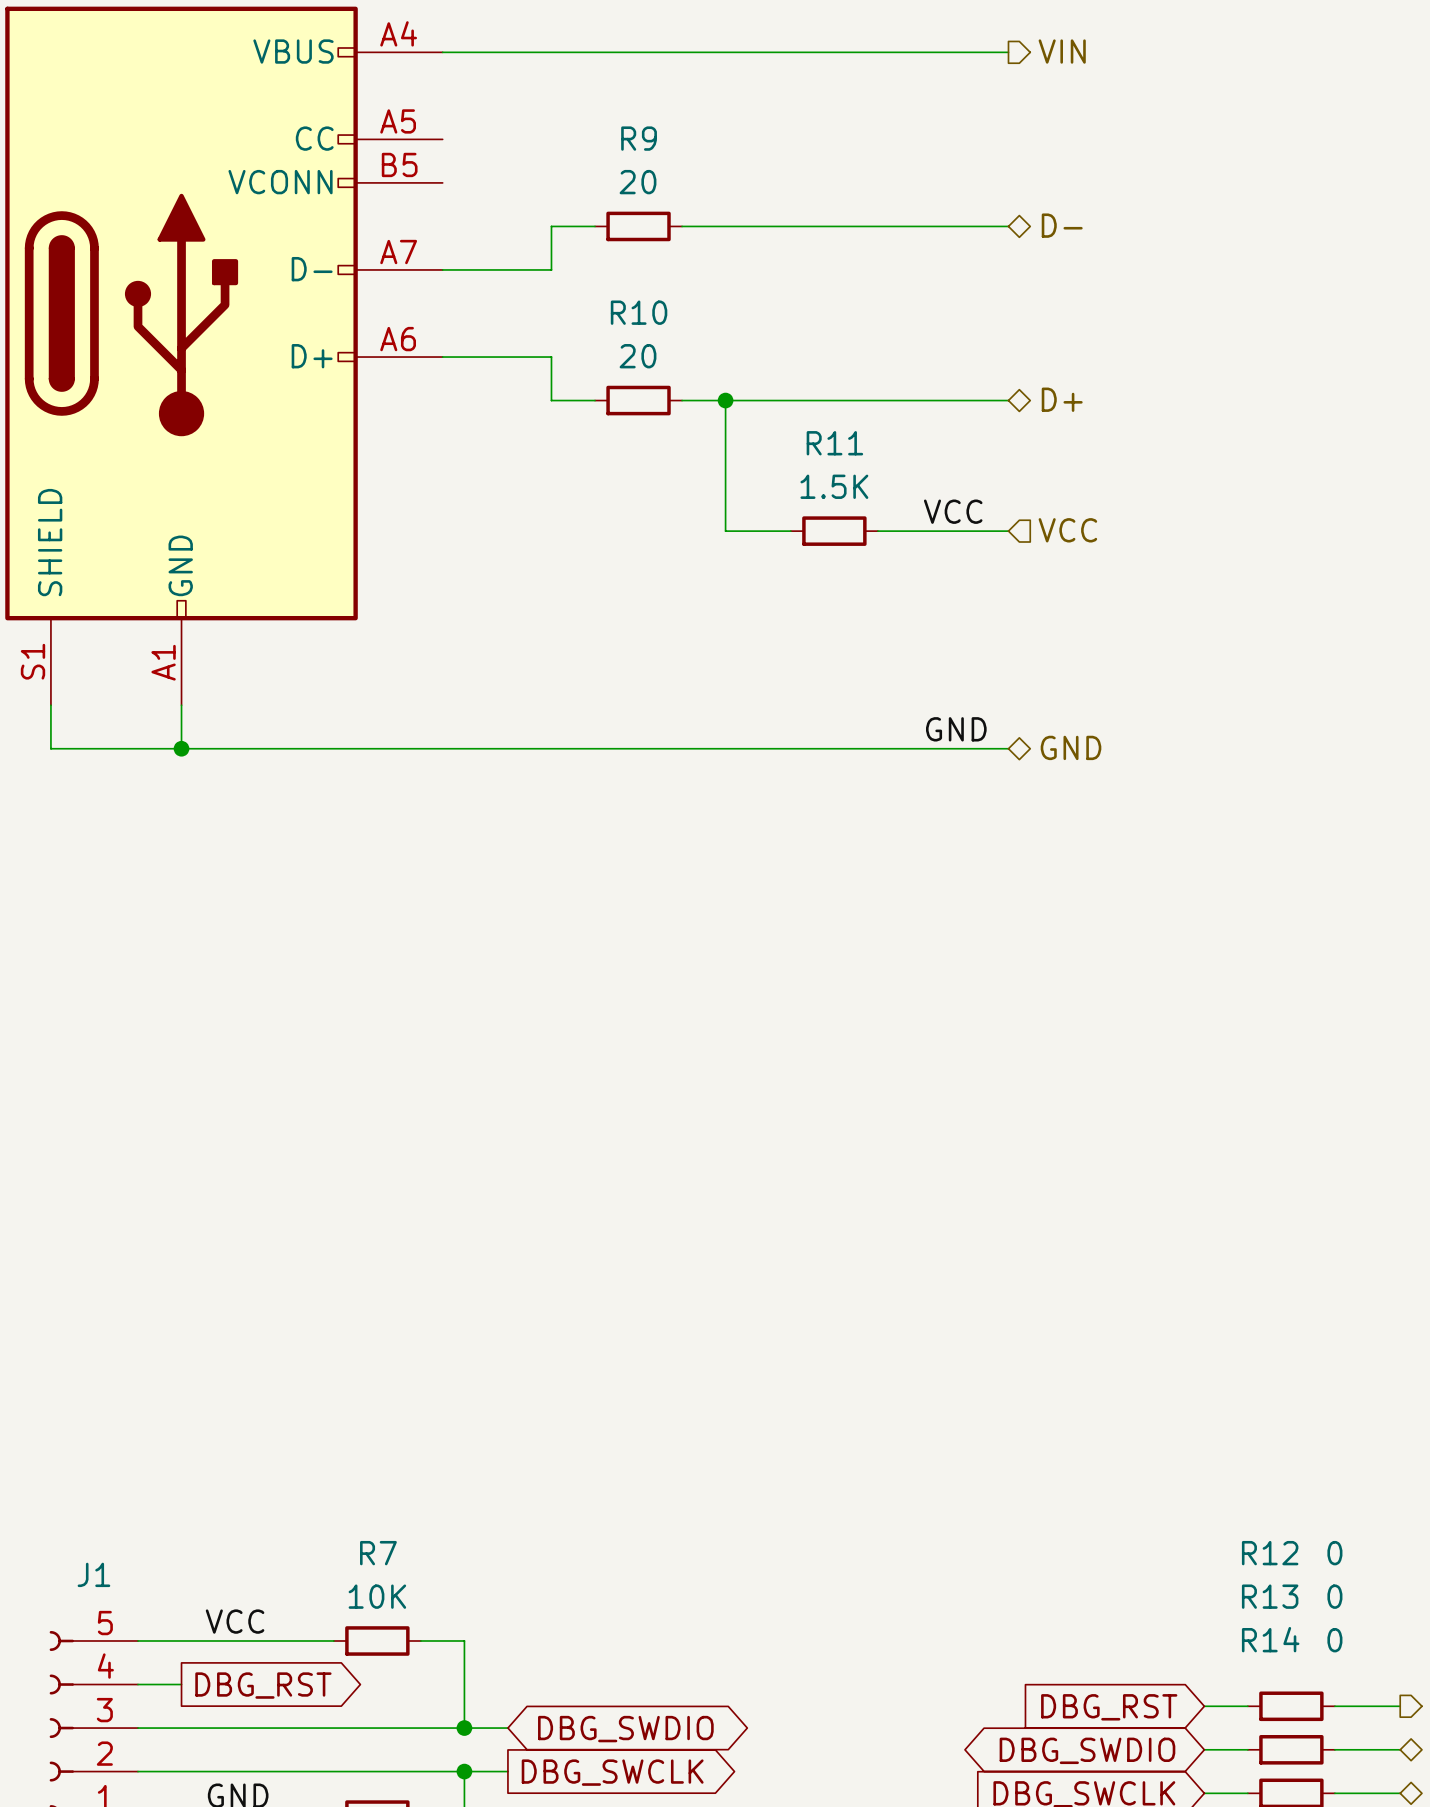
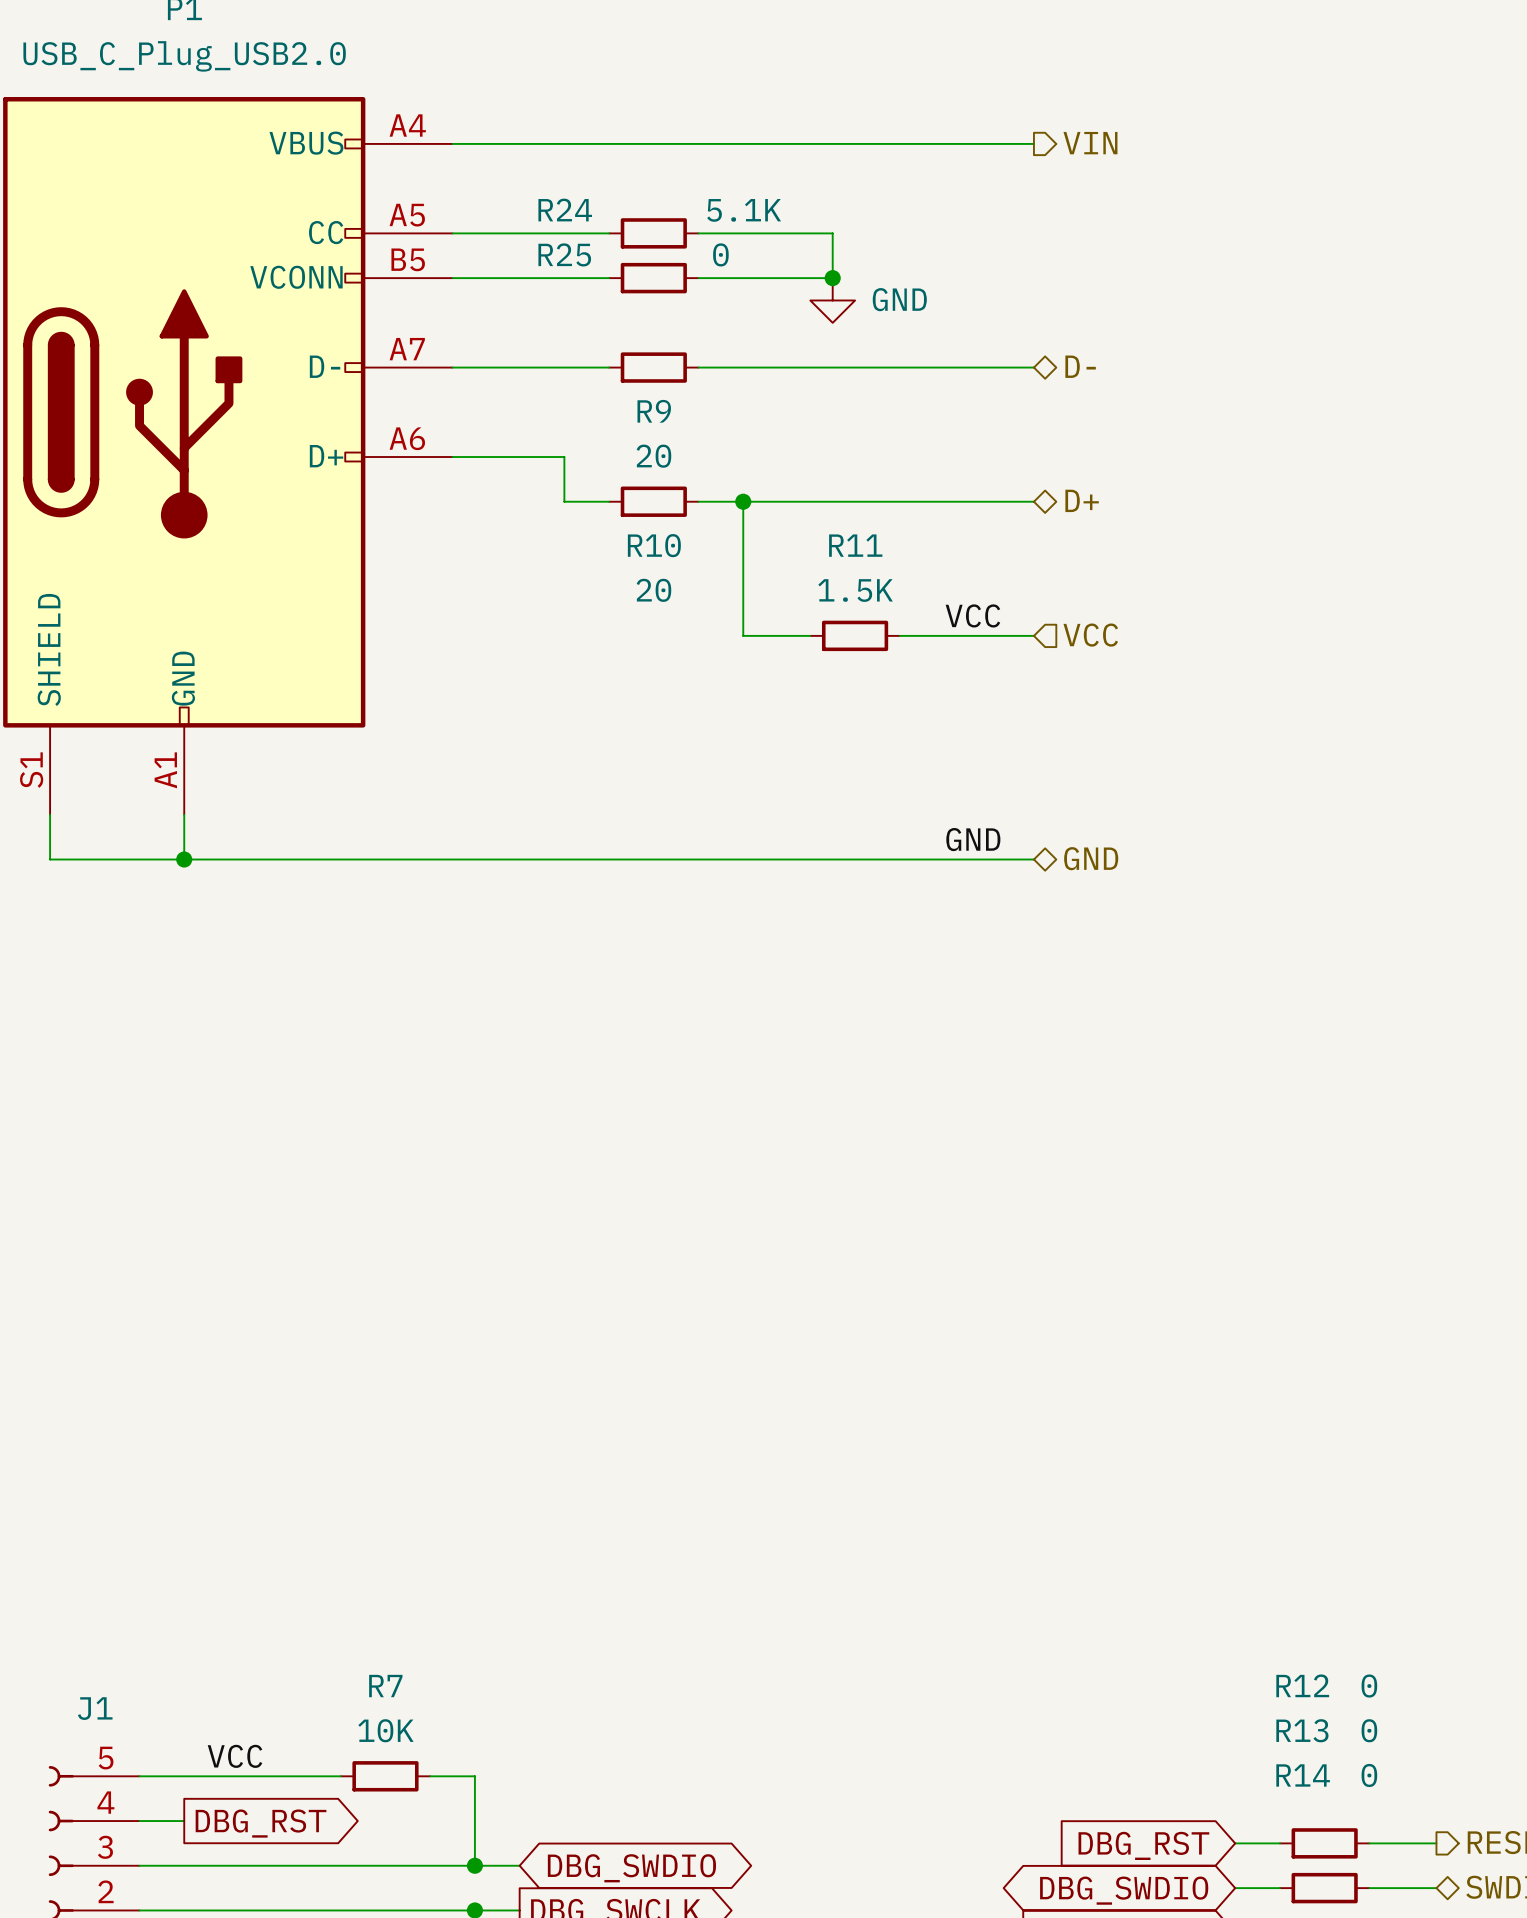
R9 name position: R9 (639, 138) -> R9 (654, 411)
wire: none -> (452, 233) (609, 233)
R24: none -> 5.1K (653, 233)
wire: none -> (698, 233) (832, 233) (832, 278) (698, 278)
wire: none -> (452, 278) (609, 278)
R9 value position: 20 (638, 182) -> 20 (653, 456)
R25: none -> 0 (653, 278)
junction: none -> (832, 278)
power symbol: none -> GND (832, 300)
hierarchical label position: D- (1062, 225) -> D- (1080, 366)
wire: (595, 226) (551, 226) (551, 269) -> (609, 367) (564, 367)
R9 position: (638, 226) -> (653, 367)
wire: (682, 226) (1008, 226) -> (698, 367) (1033, 367)
R10 name position: R10 (639, 312) -> R10 (654, 545)
R10 value position: 20 (638, 356) -> 20 (653, 590)

